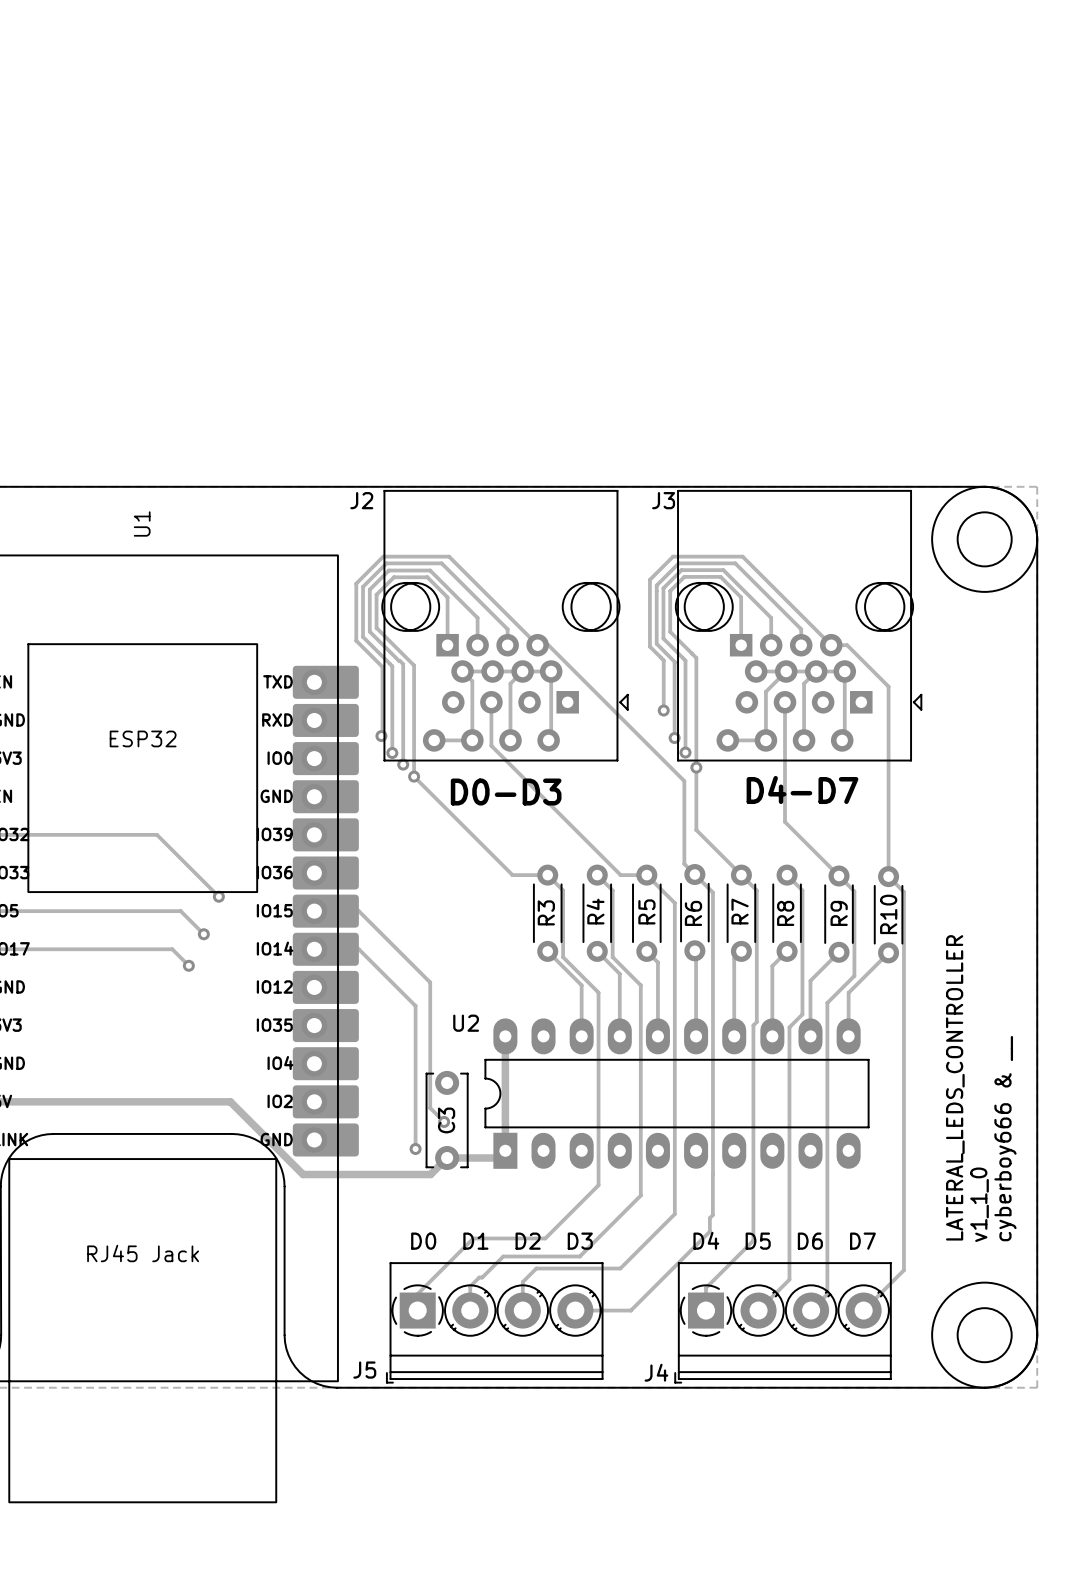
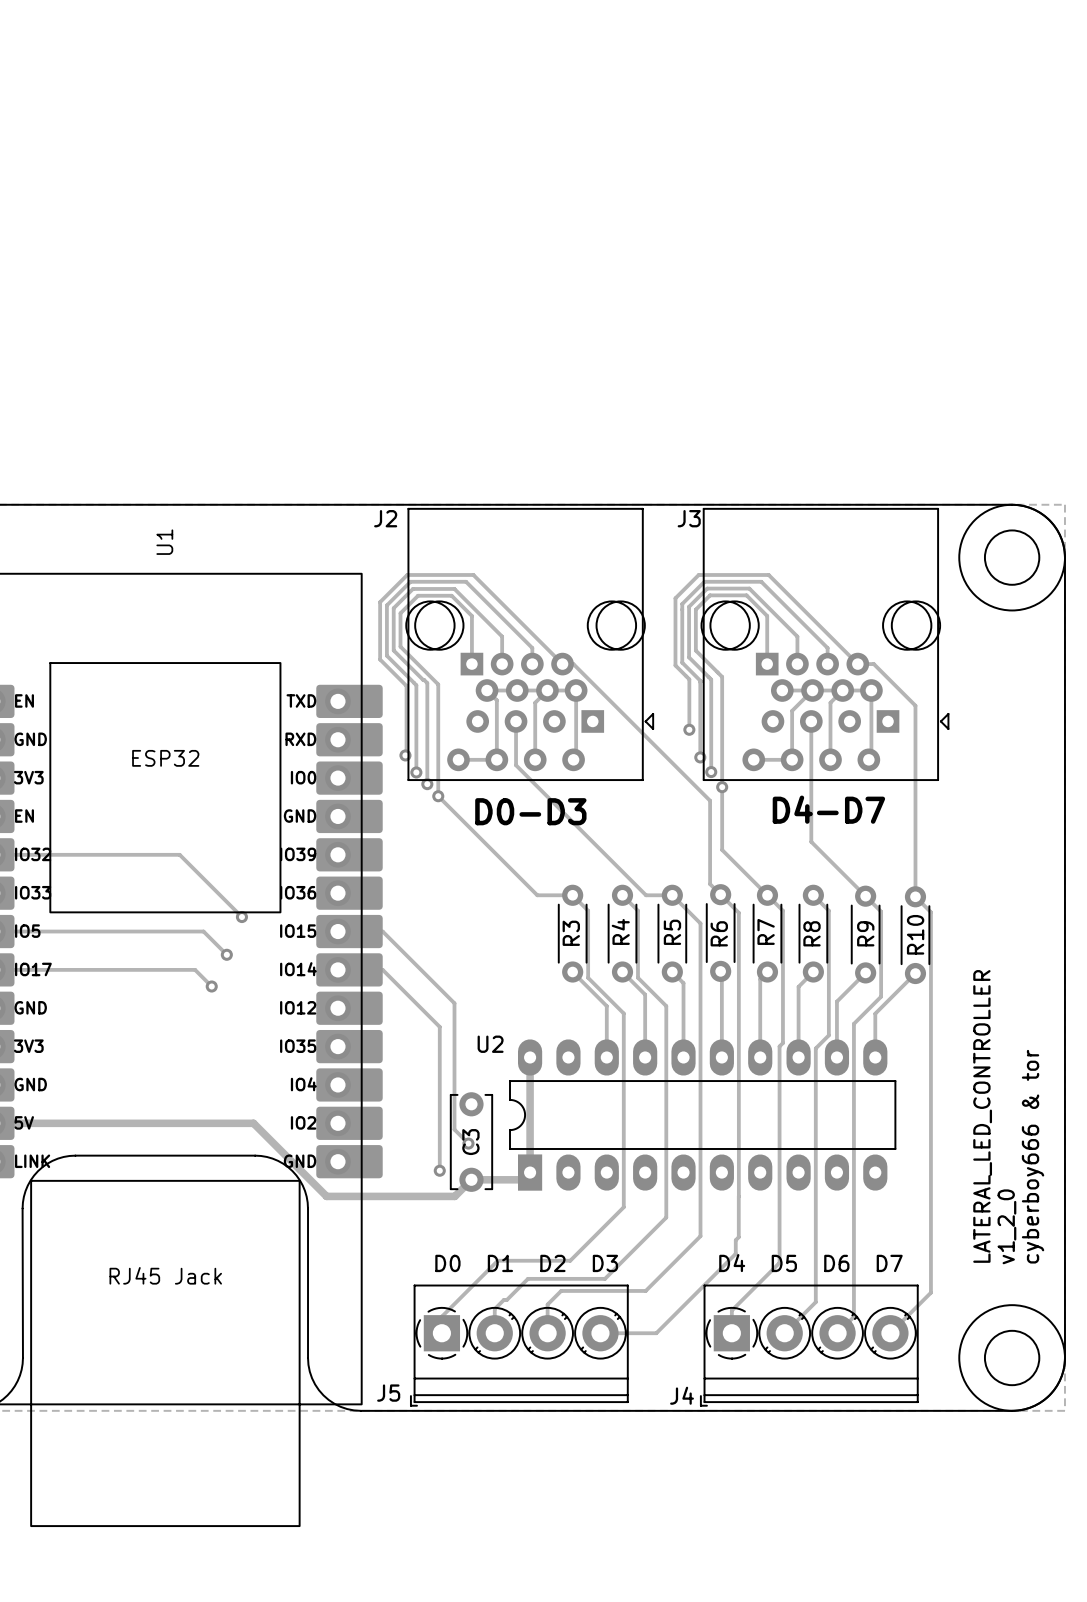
text: LATERAL_LEDS_CONTROLLER (955, 1087) -> LATERAL_LED_CONTROLLER (982, 1116)
text: cyberboy666 & __ (1005, 1138) -> cyberboy666 & tor (1033, 1156)
text: v1_1_0 (979, 1204) -> v1_2_0 (1006, 1226)

